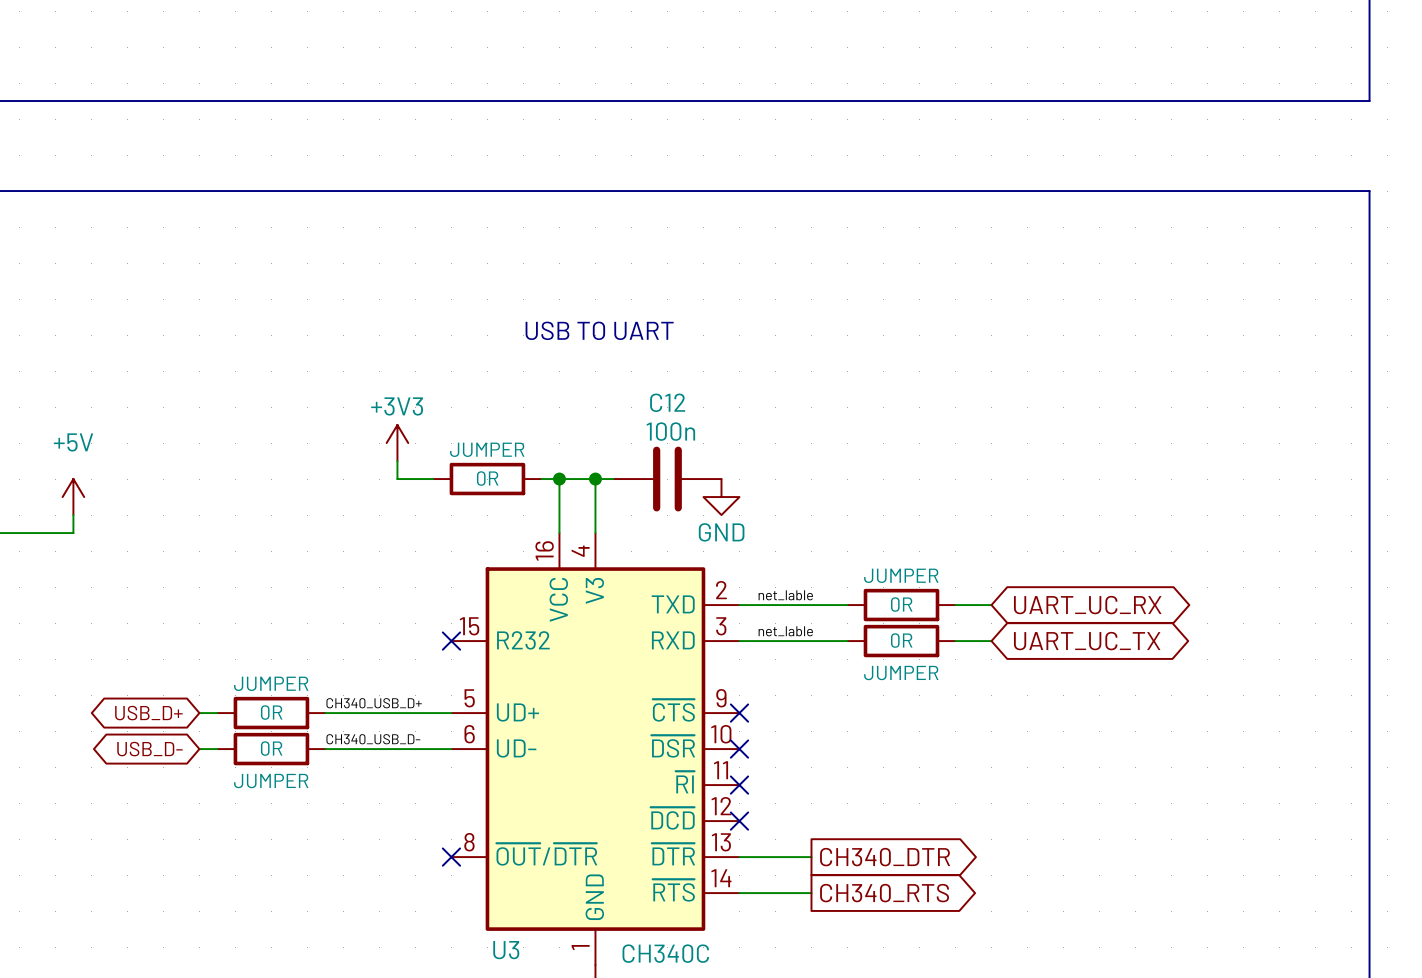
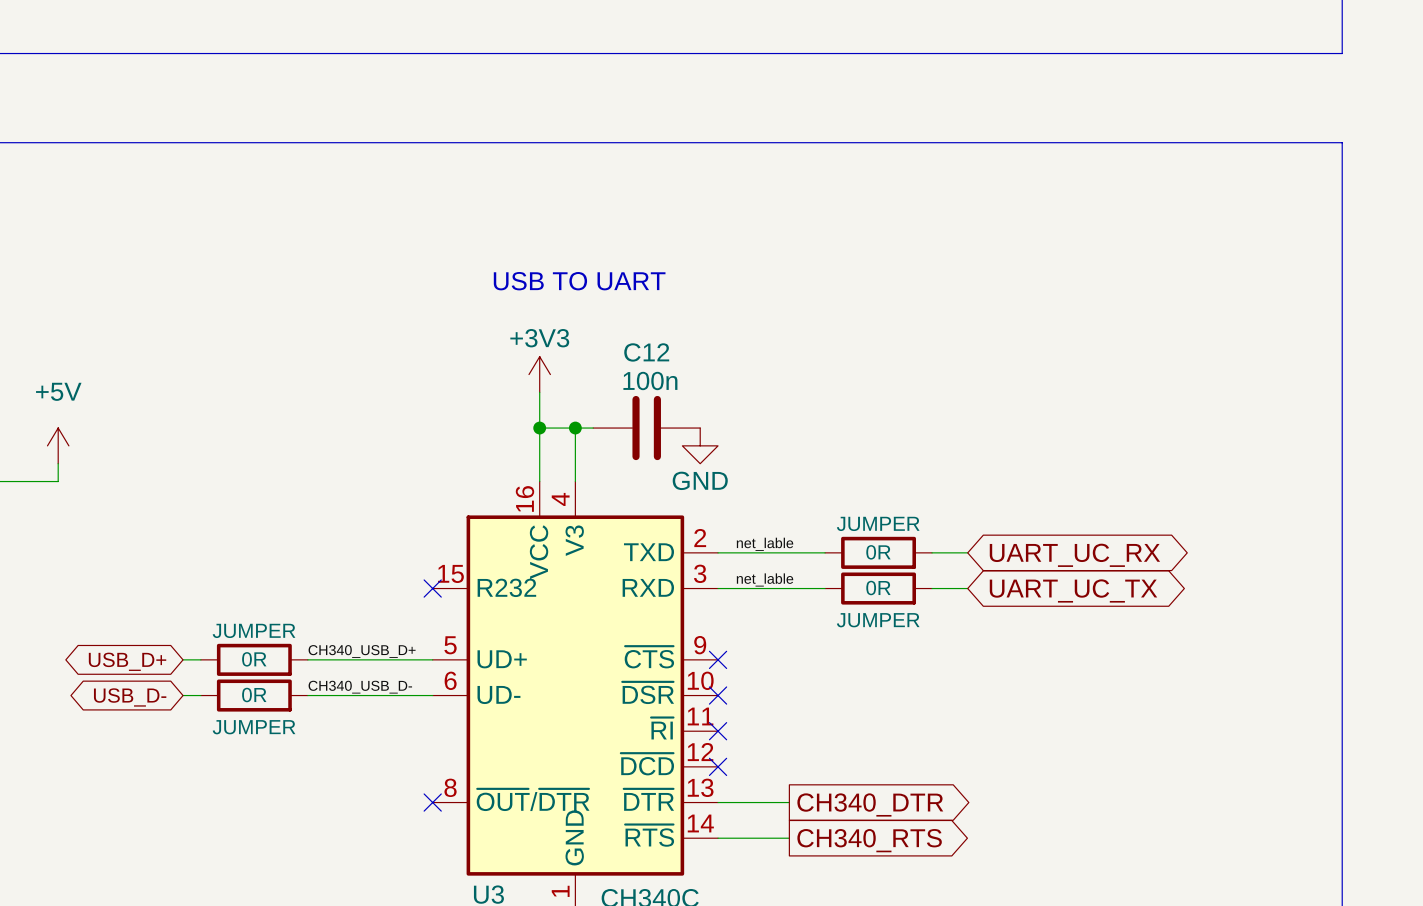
power symbol position: +3V3 (397, 443) -> +3V3 (539, 374)
wire: (397, 461) (397, 479) (433, 479) -> none
part: 0R (487, 479) -> none
wire: (541, 479) (559, 479) -> (539, 392) (539, 428)

